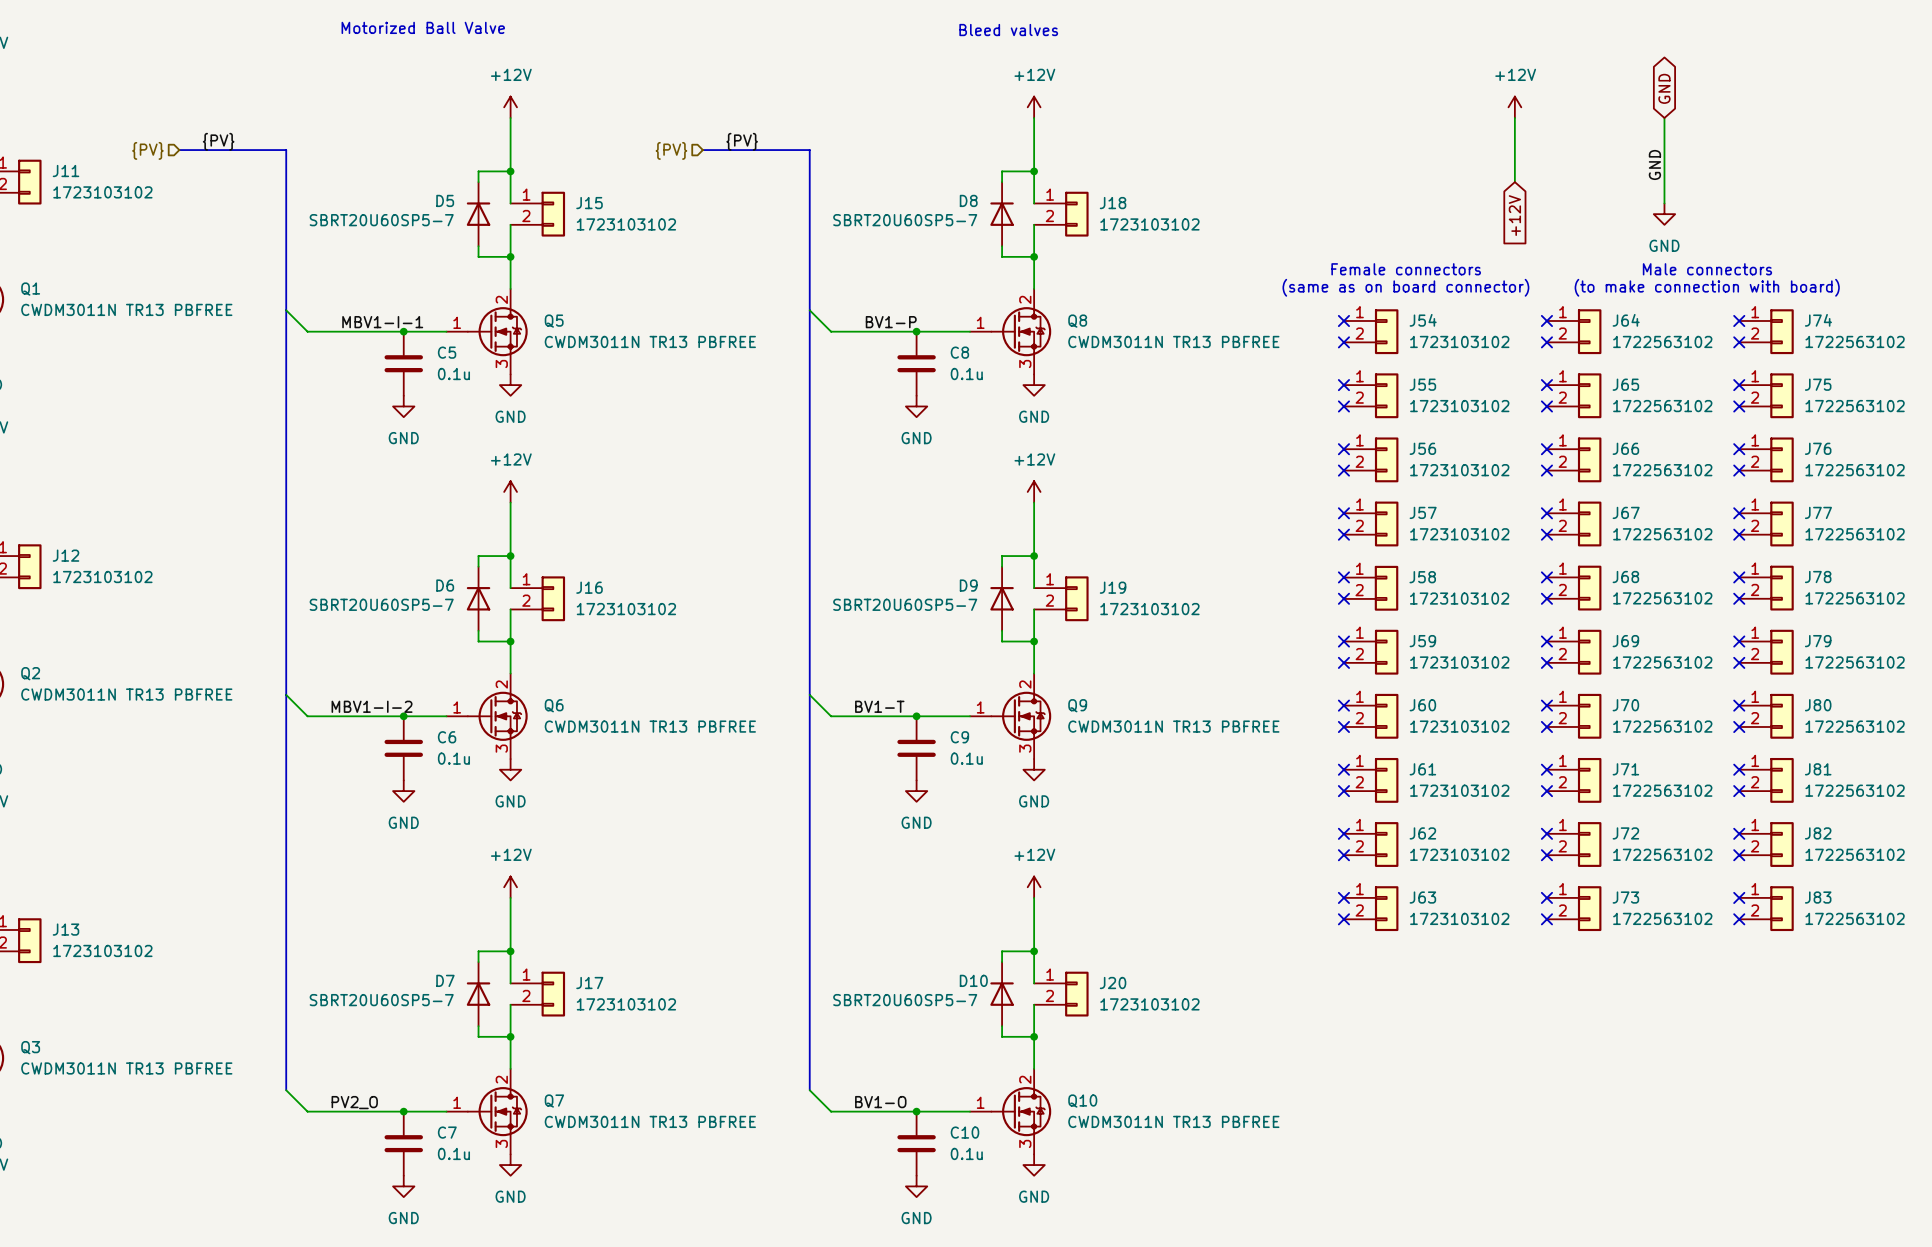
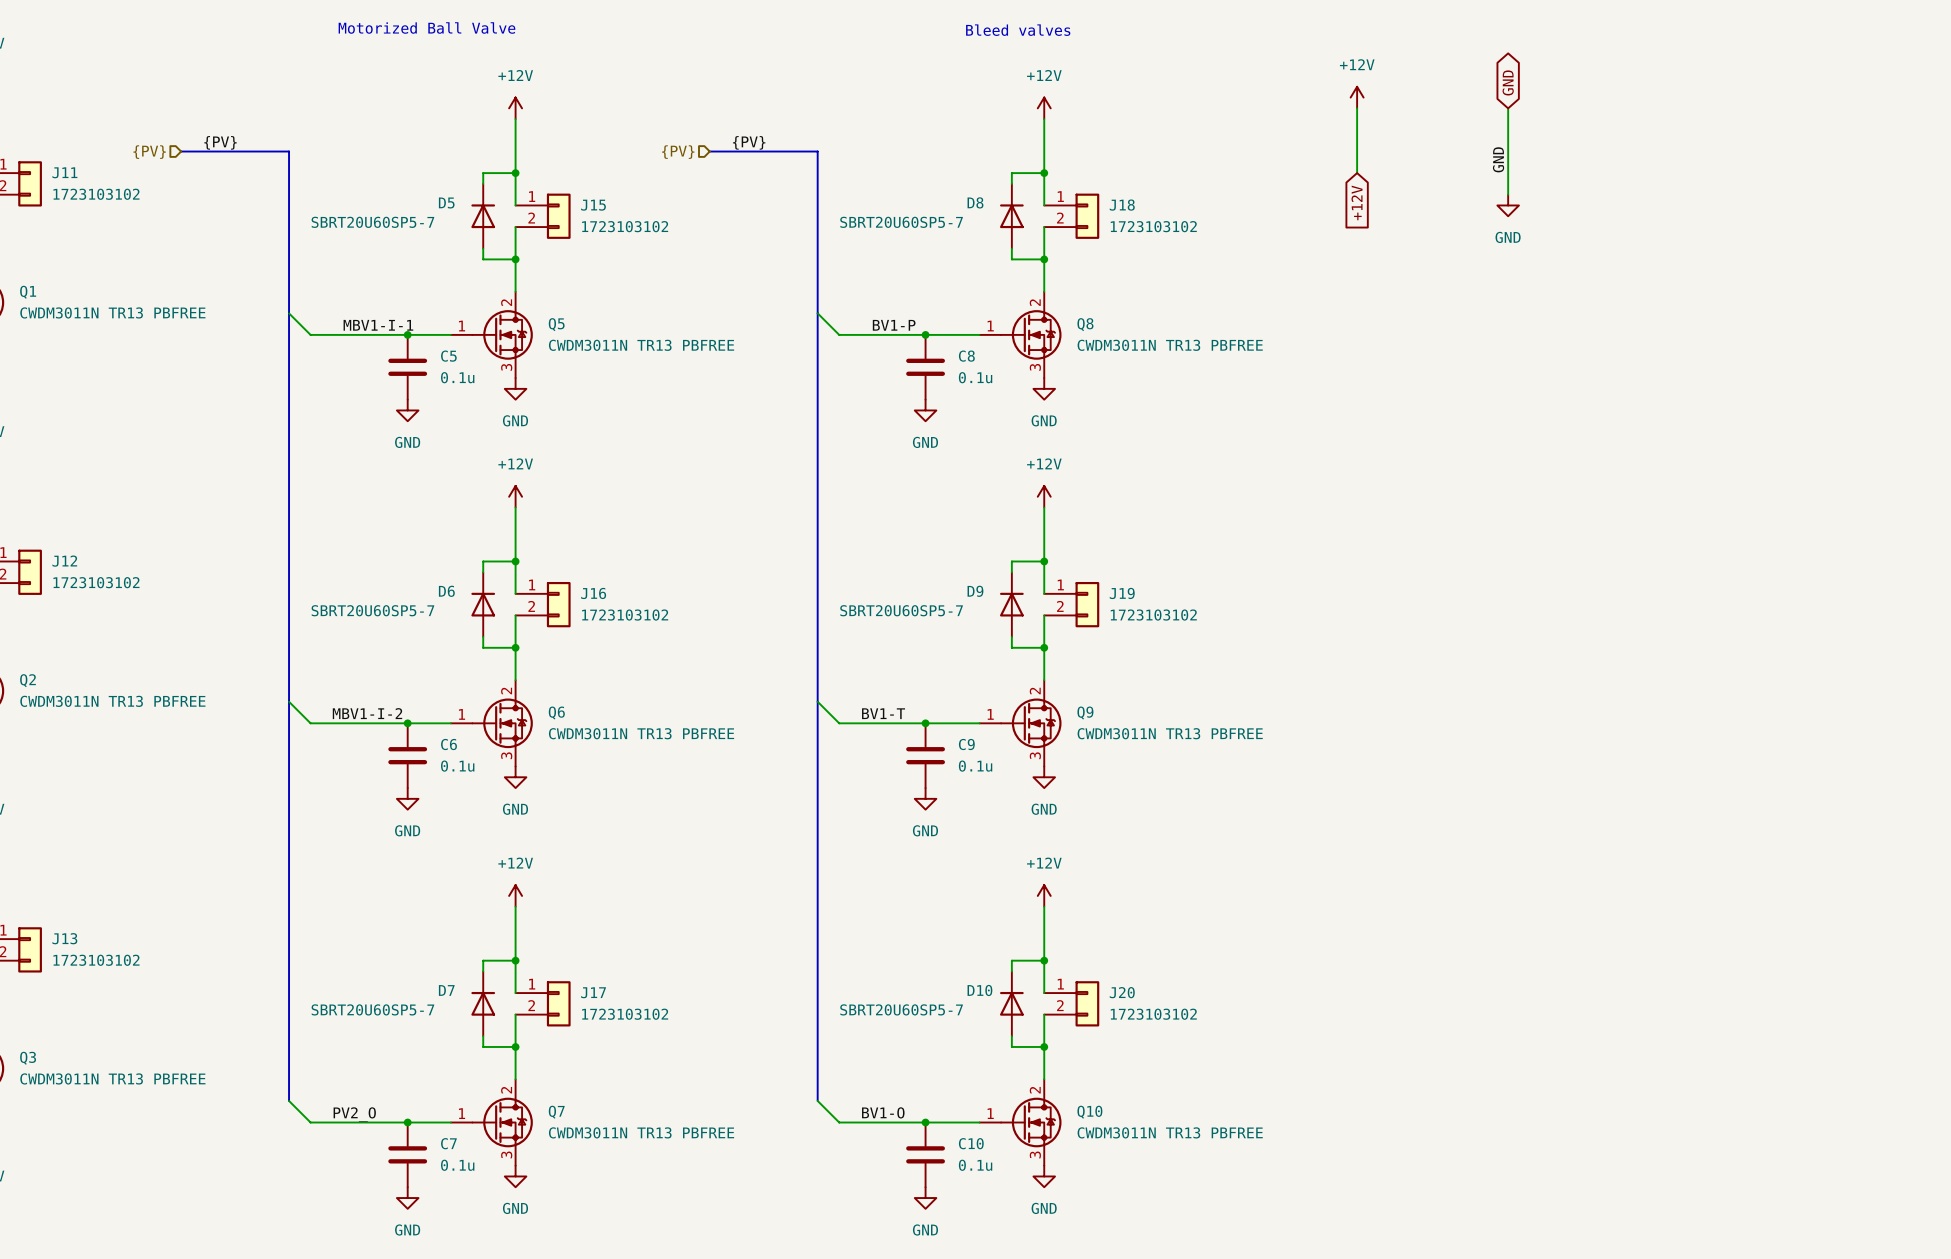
global label position: GND (1664, 88) -> GND (1508, 82)
power symbol position: +12V (1514, 107) -> +12V (1357, 97)
wire: (1514, 117) (1514, 182) -> (1357, 108) (1357, 173)
wire: (1664, 117) (1664, 203) -> (1508, 108) (1508, 194)
label position: GND (1654, 164) -> GND (1498, 159)
power symbol position: GND (1664, 214) -> GND (1508, 205)
global label position: +12V (1514, 215) -> +12V (1357, 202)
text: Female connectors (1406, 269) -> none
text: Male connectors (1707, 269) -> none
text: (same as on board connector) (1405, 287) -> none
text: (to make connection with board) (1707, 287) -> none
no-connect mark: (1343, 320) -> none
no-connect mark: (1546, 320) -> none
no-connect mark: (1739, 320) -> none
J54: 1723103102 (1371, 331) -> none
J64: 1722563102 (1574, 331) -> none
J74: 1722563102 (1766, 331) -> none
no-connect mark: (1343, 342) -> none
no-connect mark: (1546, 342) -> none
no-connect mark: (1739, 342) -> none
no-connect mark: (1343, 385) -> none
no-connect mark: (1546, 385) -> none
no-connect mark: (1739, 385) -> none
J55: 1723103102 (1371, 395) -> none
J65: 1722563102 (1574, 395) -> none
J75: 1722563102 (1766, 395) -> none
no-connect mark: (1343, 406) -> none
no-connect mark: (1546, 406) -> none
no-connect mark: (1739, 406) -> none
no-connect mark: (1343, 449) -> none
no-connect mark: (1546, 449) -> none
no-connect mark: (1739, 449) -> none
J56: 1723103102 (1371, 459) -> none
J66: 1722563102 (1574, 459) -> none
J76: 1722563102 (1766, 459) -> none
no-connect mark: (1343, 470) -> none
no-connect mark: (1546, 470) -> none
no-connect mark: (1739, 470) -> none
no-connect mark: (1343, 513) -> none
no-connect mark: (1546, 513) -> none
no-connect mark: (1739, 513) -> none
J57: 1723103102 (1371, 523) -> none
J67: 1722563102 (1574, 523) -> none
J77: 1722563102 (1766, 523) -> none
no-connect mark: (1343, 534) -> none
no-connect mark: (1546, 534) -> none
no-connect mark: (1739, 534) -> none
no-connect mark: (1343, 577) -> none
no-connect mark: (1546, 577) -> none
no-connect mark: (1739, 577) -> none
J58: 1723103102 (1371, 588) -> none
J68: 1722563102 (1574, 588) -> none
J78: 1722563102 (1766, 588) -> none
no-connect mark: (1343, 598) -> none
no-connect mark: (1546, 598) -> none
no-connect mark: (1739, 598) -> none
no-connect mark: (1343, 641) -> none
no-connect mark: (1546, 641) -> none
no-connect mark: (1739, 641) -> none
J59: 1723103102 (1371, 652) -> none
J69: 1722563102 (1574, 652) -> none
J79: 1722563102 (1766, 652) -> none
no-connect mark: (1343, 662) -> none
no-connect mark: (1546, 662) -> none
no-connect mark: (1739, 662) -> none
no-connect mark: (1343, 705) -> none
no-connect mark: (1546, 705) -> none
no-connect mark: (1739, 705) -> none
J60: 1723103102 (1371, 716) -> none
J70: 1722563102 (1574, 716) -> none
J80: 1722563102 (1766, 716) -> none
no-connect mark: (1343, 726) -> none
no-connect mark: (1546, 726) -> none
no-connect mark: (1739, 726) -> none
no-connect mark: (1343, 769) -> none
no-connect mark: (1546, 769) -> none
no-connect mark: (1739, 769) -> none
J61: 1723103102 (1371, 780) -> none
J71: 1722563102 (1574, 780) -> none
J81: 1722563102 (1766, 780) -> none
no-connect mark: (1343, 791) -> none
no-connect mark: (1546, 791) -> none
no-connect mark: (1739, 791) -> none
no-connect mark: (1343, 833) -> none
no-connect mark: (1546, 833) -> none
no-connect mark: (1739, 833) -> none
J62: 1723103102 (1371, 844) -> none
J72: 1722563102 (1574, 844) -> none
J82: 1722563102 (1766, 844) -> none
no-connect mark: (1343, 855) -> none
no-connect mark: (1546, 855) -> none
no-connect mark: (1739, 855) -> none
no-connect mark: (1343, 897) -> none
no-connect mark: (1546, 897) -> none
no-connect mark: (1739, 897) -> none
J63: 1723103102 (1371, 908) -> none
J73: 1722563102 (1574, 908) -> none
J83: 1722563102 (1766, 908) -> none
no-connect mark: (1343, 919) -> none
no-connect mark: (1546, 919) -> none
no-connect mark: (1739, 919) -> none

